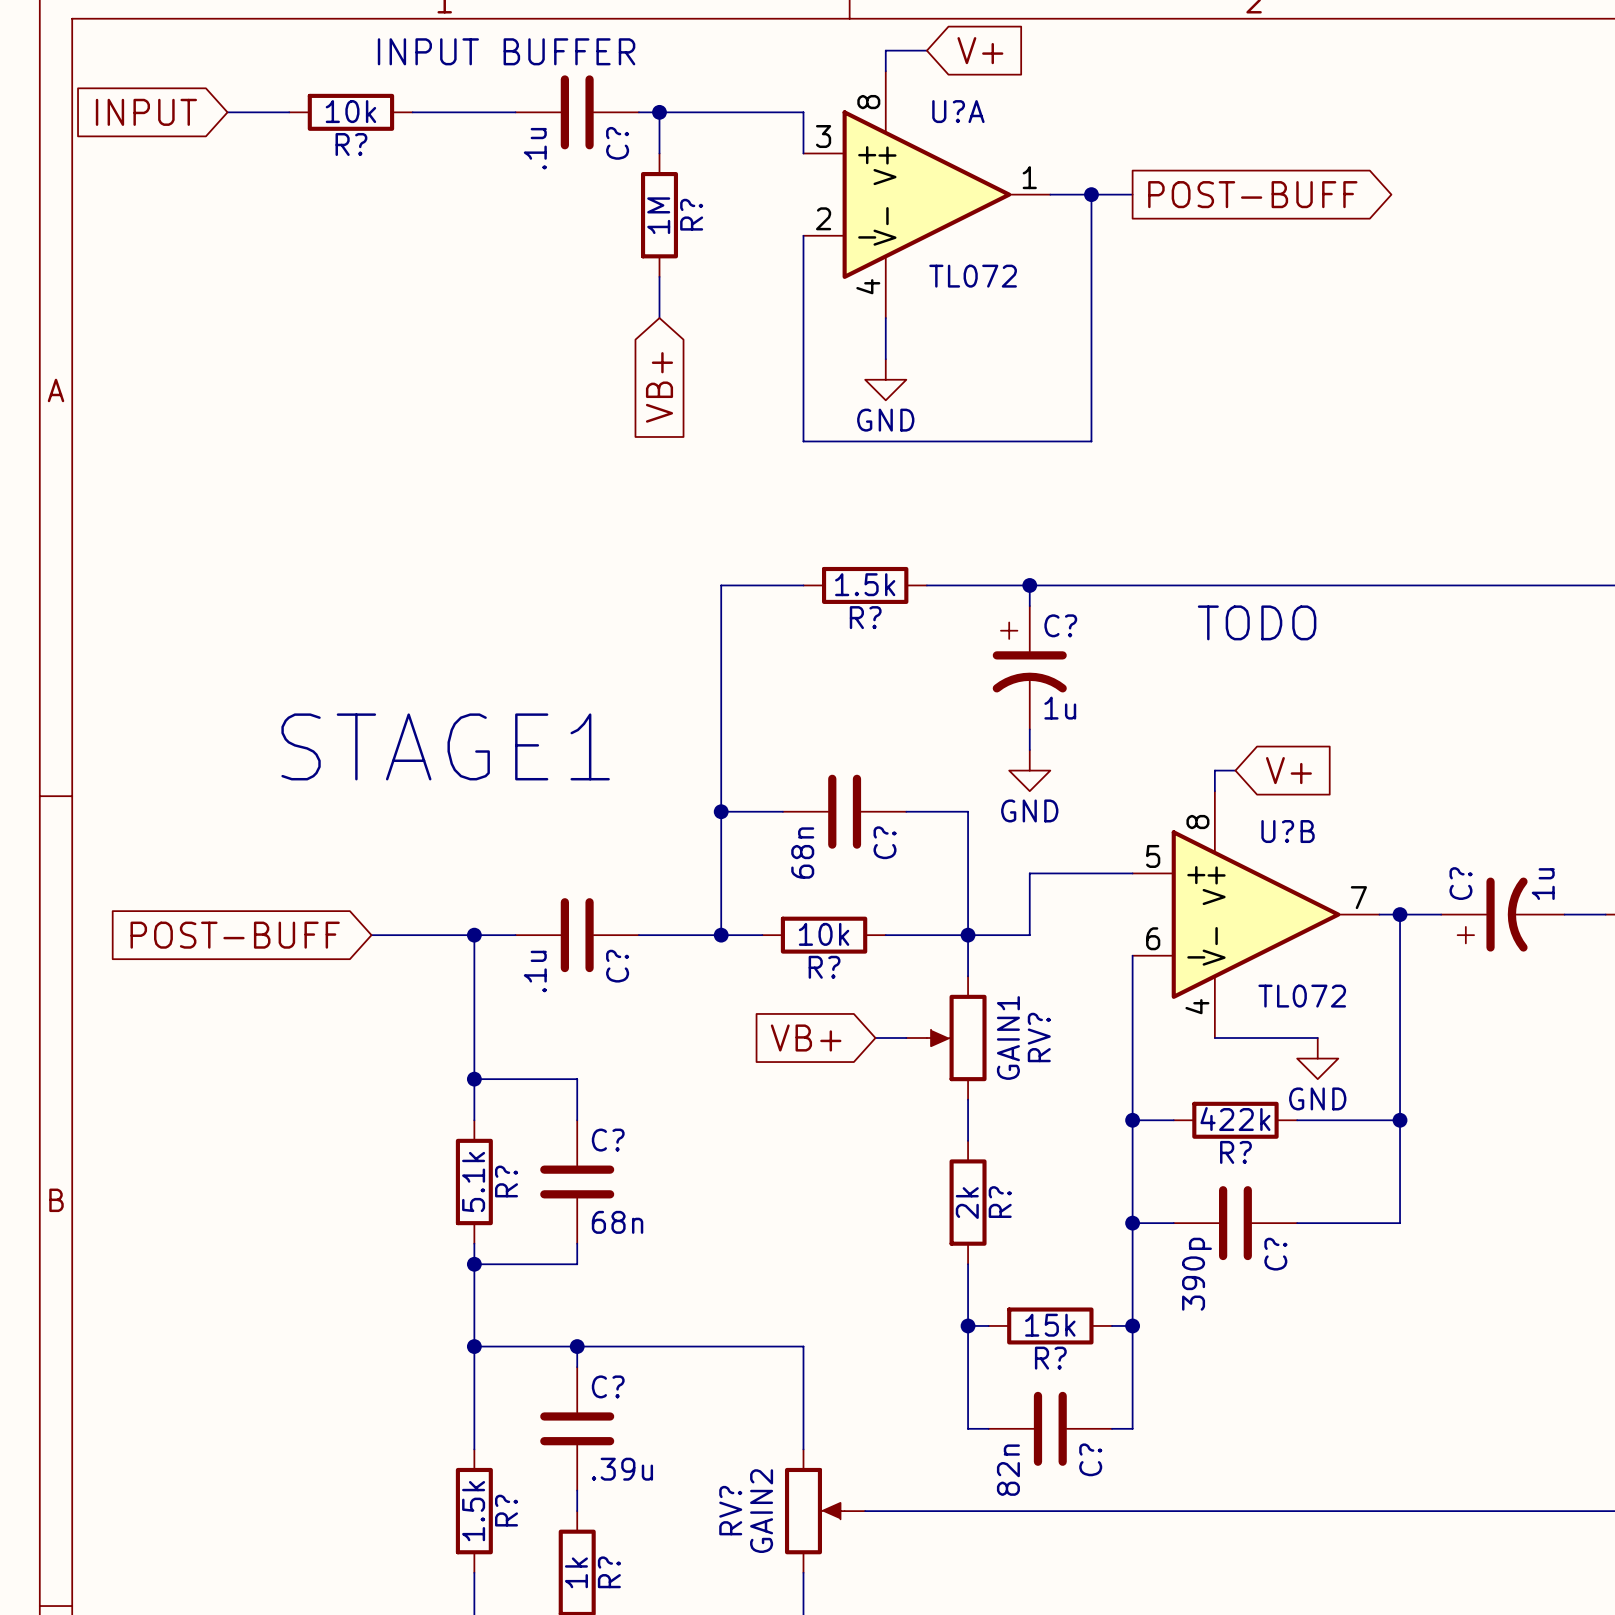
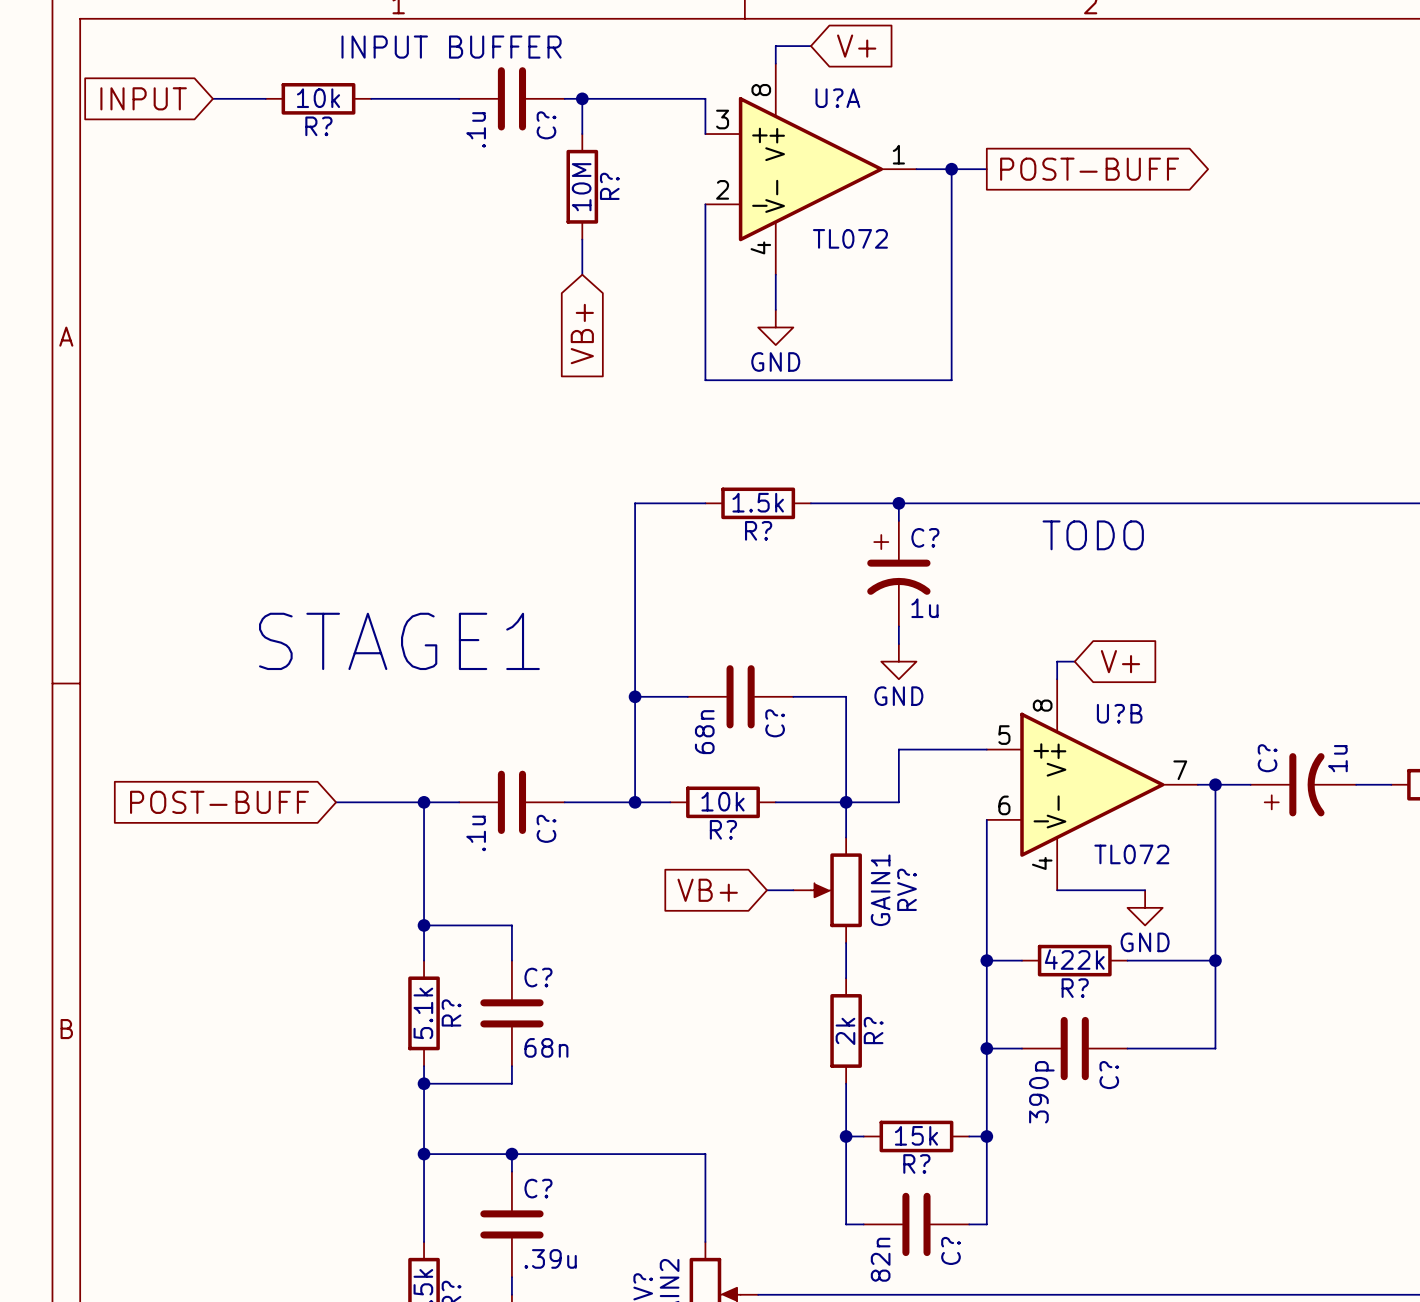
R? value: 1M (658, 215) -> 10M (581, 187)

